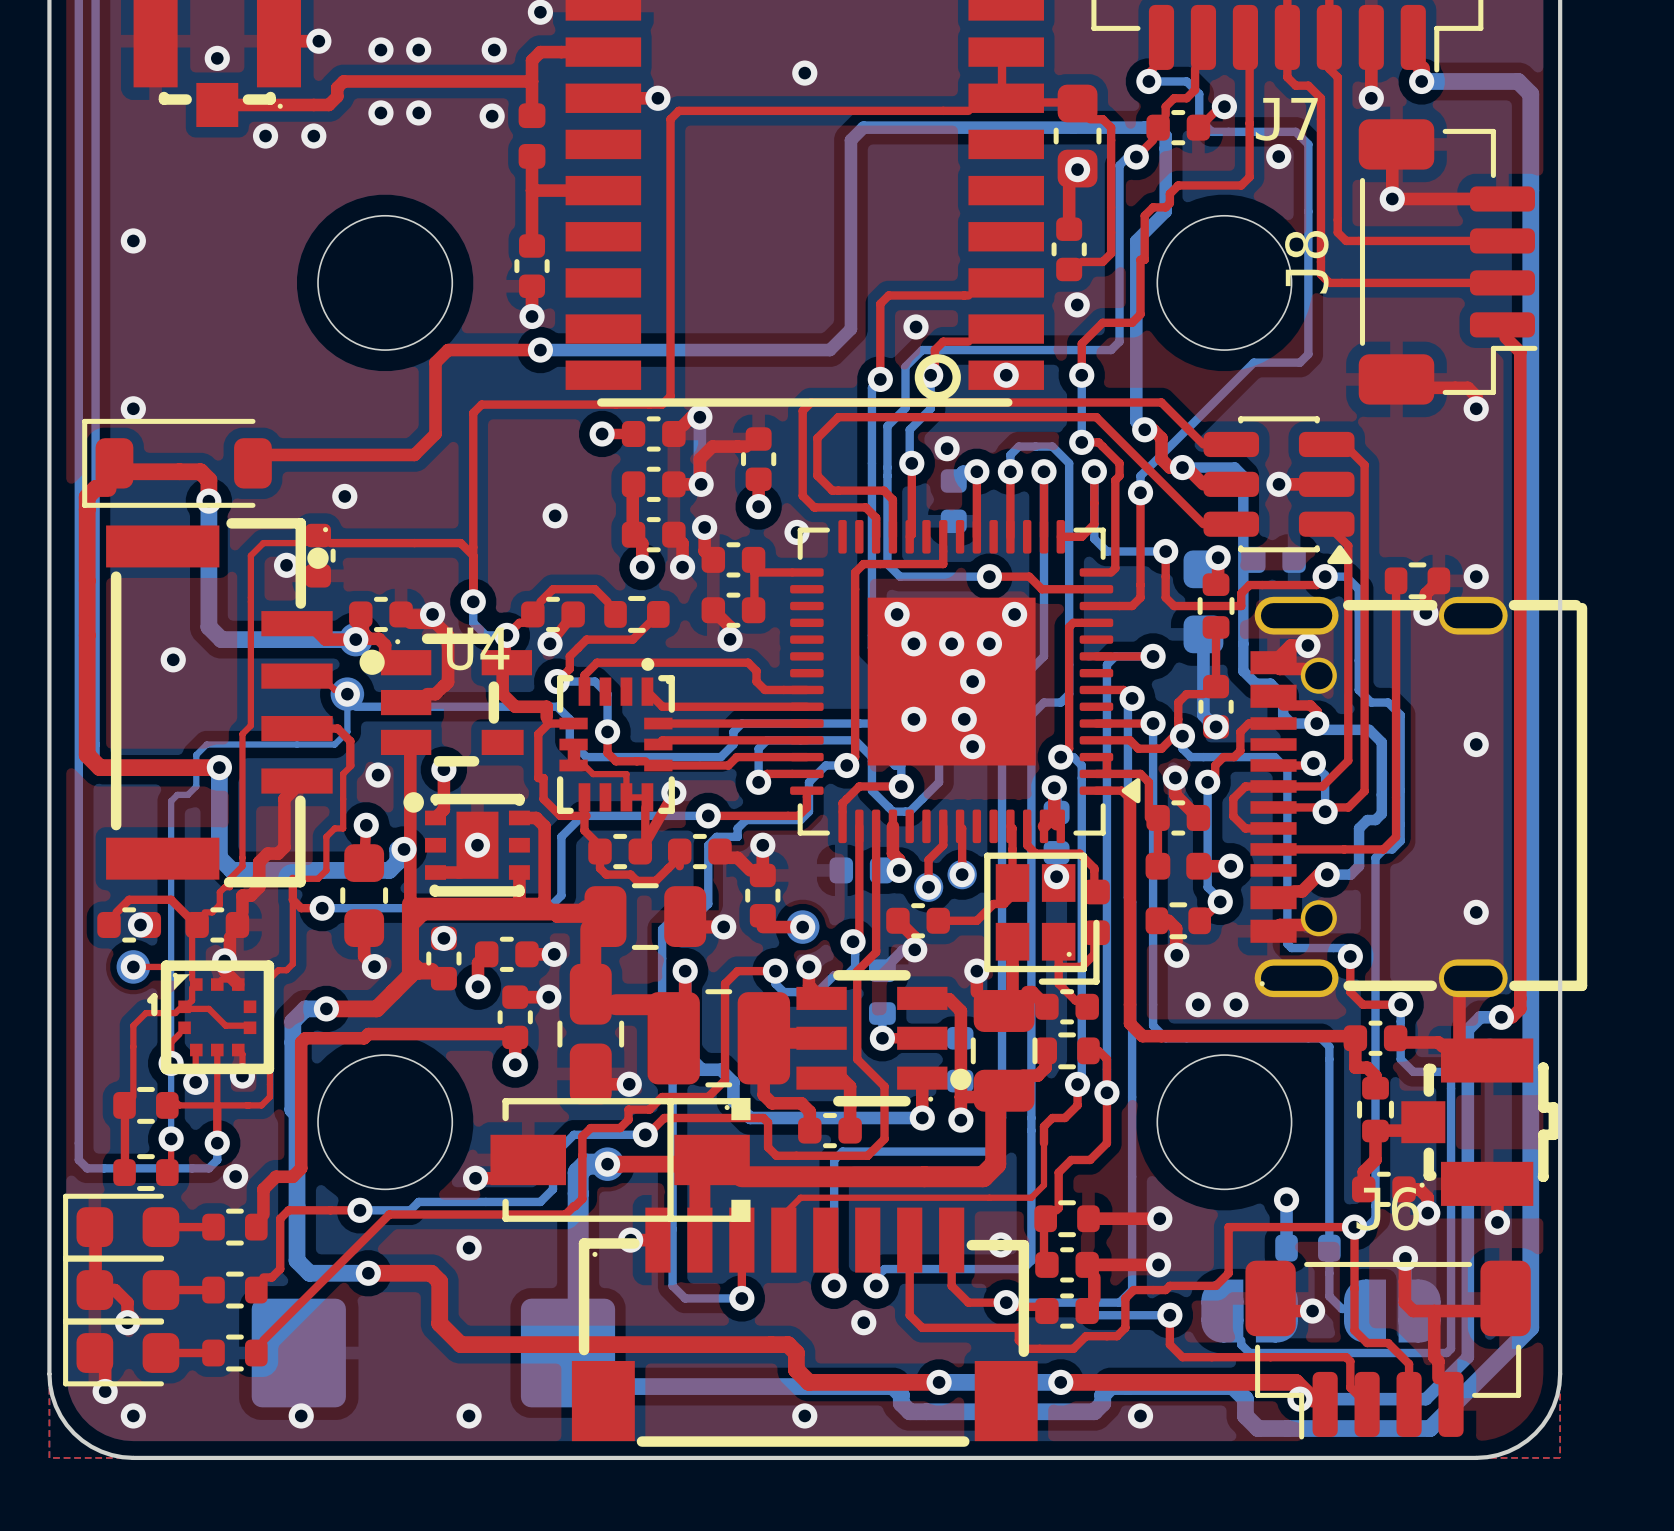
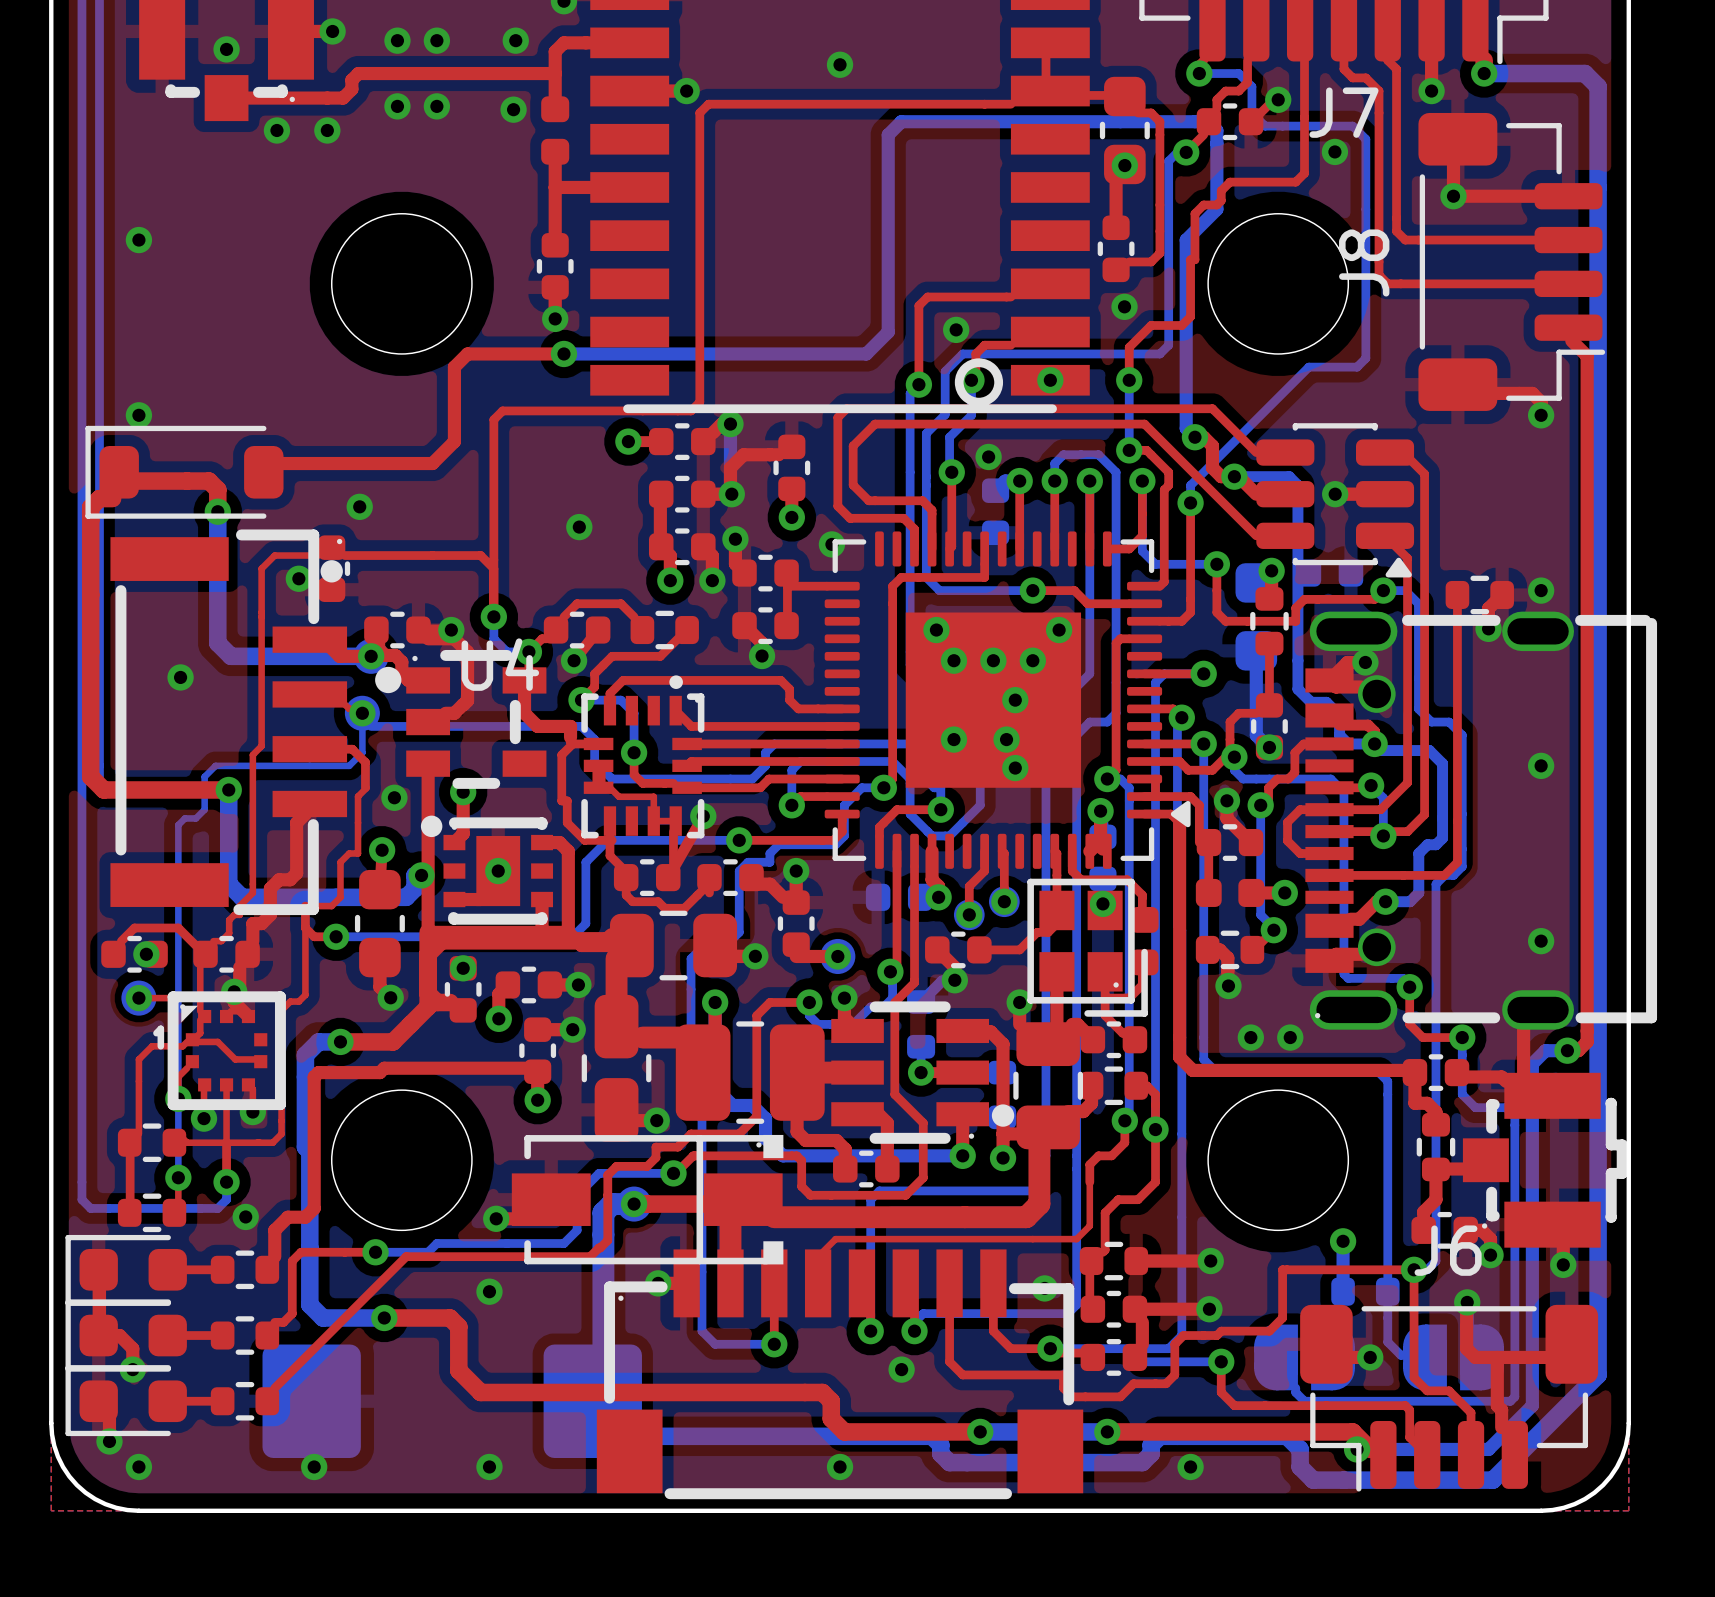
part footprint: [359, 633, 533, 767] -> [375, 649, 547, 789]

